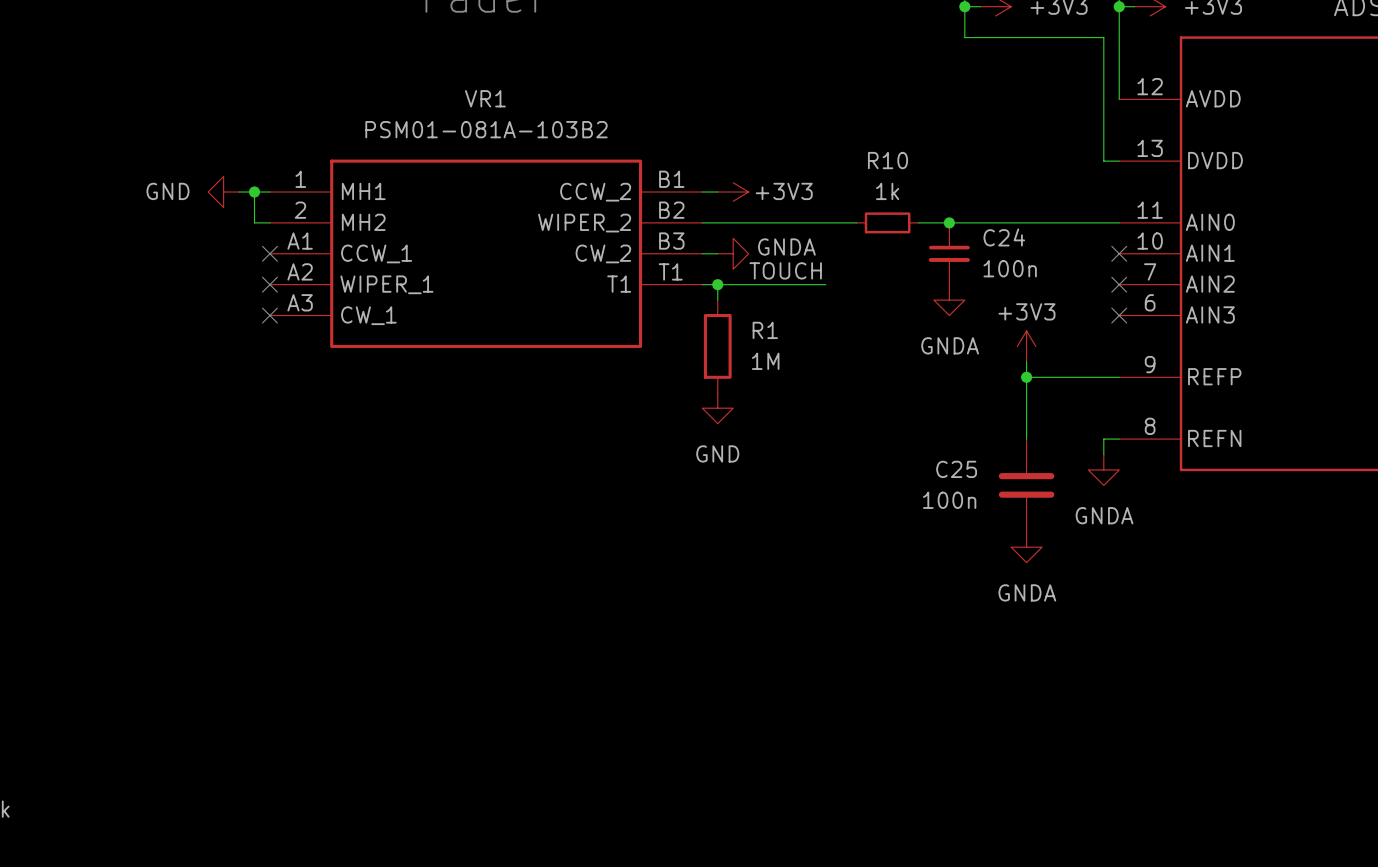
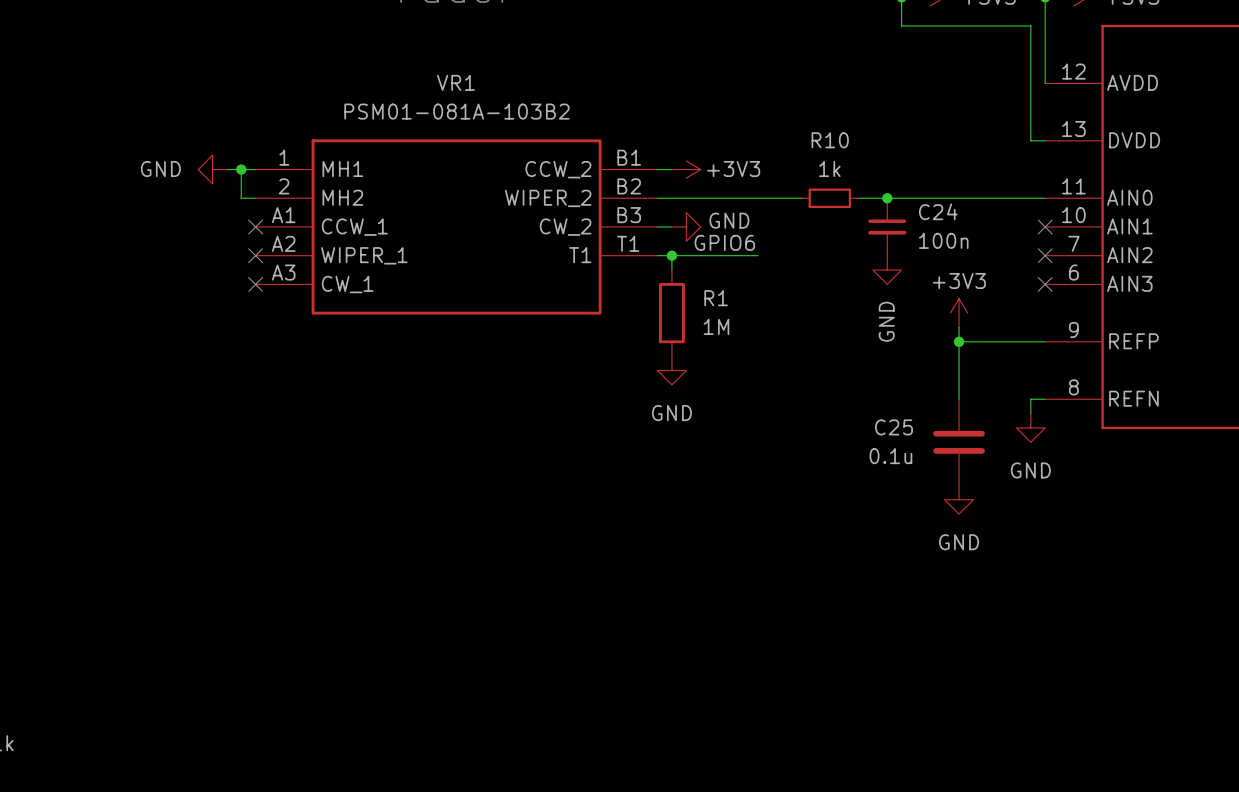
power symbol: GNDA (733, 253) -> GND (686, 226)
label: none -> GPIO6 (724, 242)
label: TOUCH (785, 270) -> none
wire: (810, 284) (825, 284) -> none
power symbol: GNDA (949, 300) -> GND (887, 270)
power symbol: GNDA (1103, 469) -> GND (1030, 427)
C25 value: 100n (949, 500) -> 0.1u (890, 456)
power symbol: GNDA (1026, 547) -> GND (959, 499)

